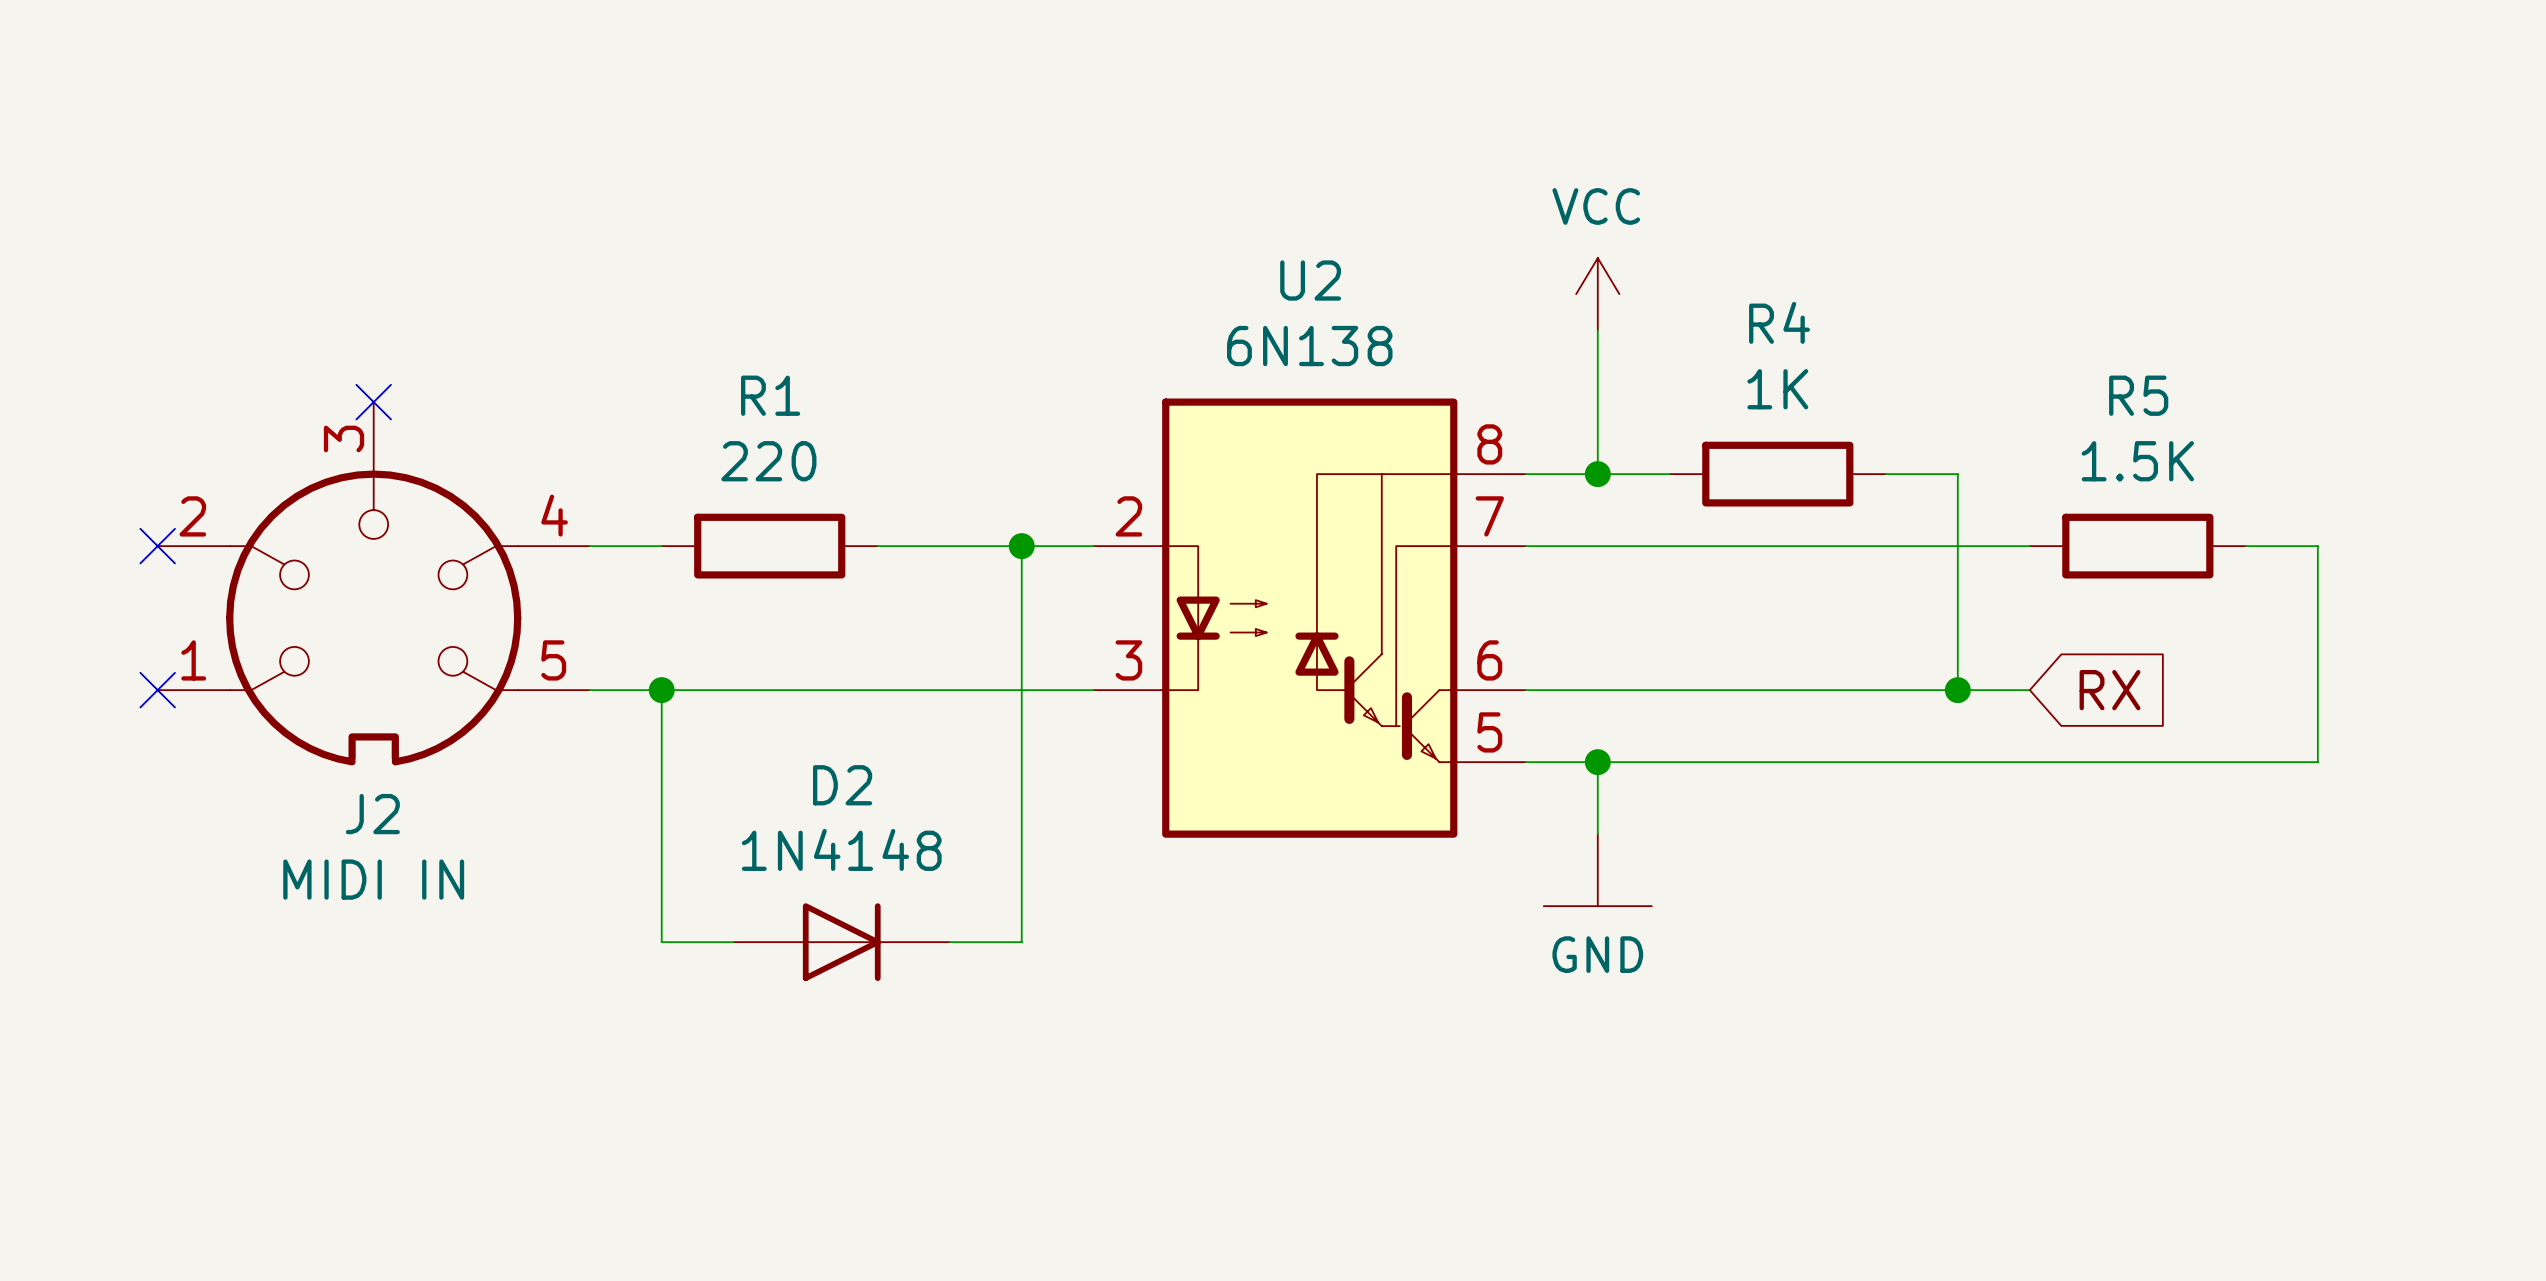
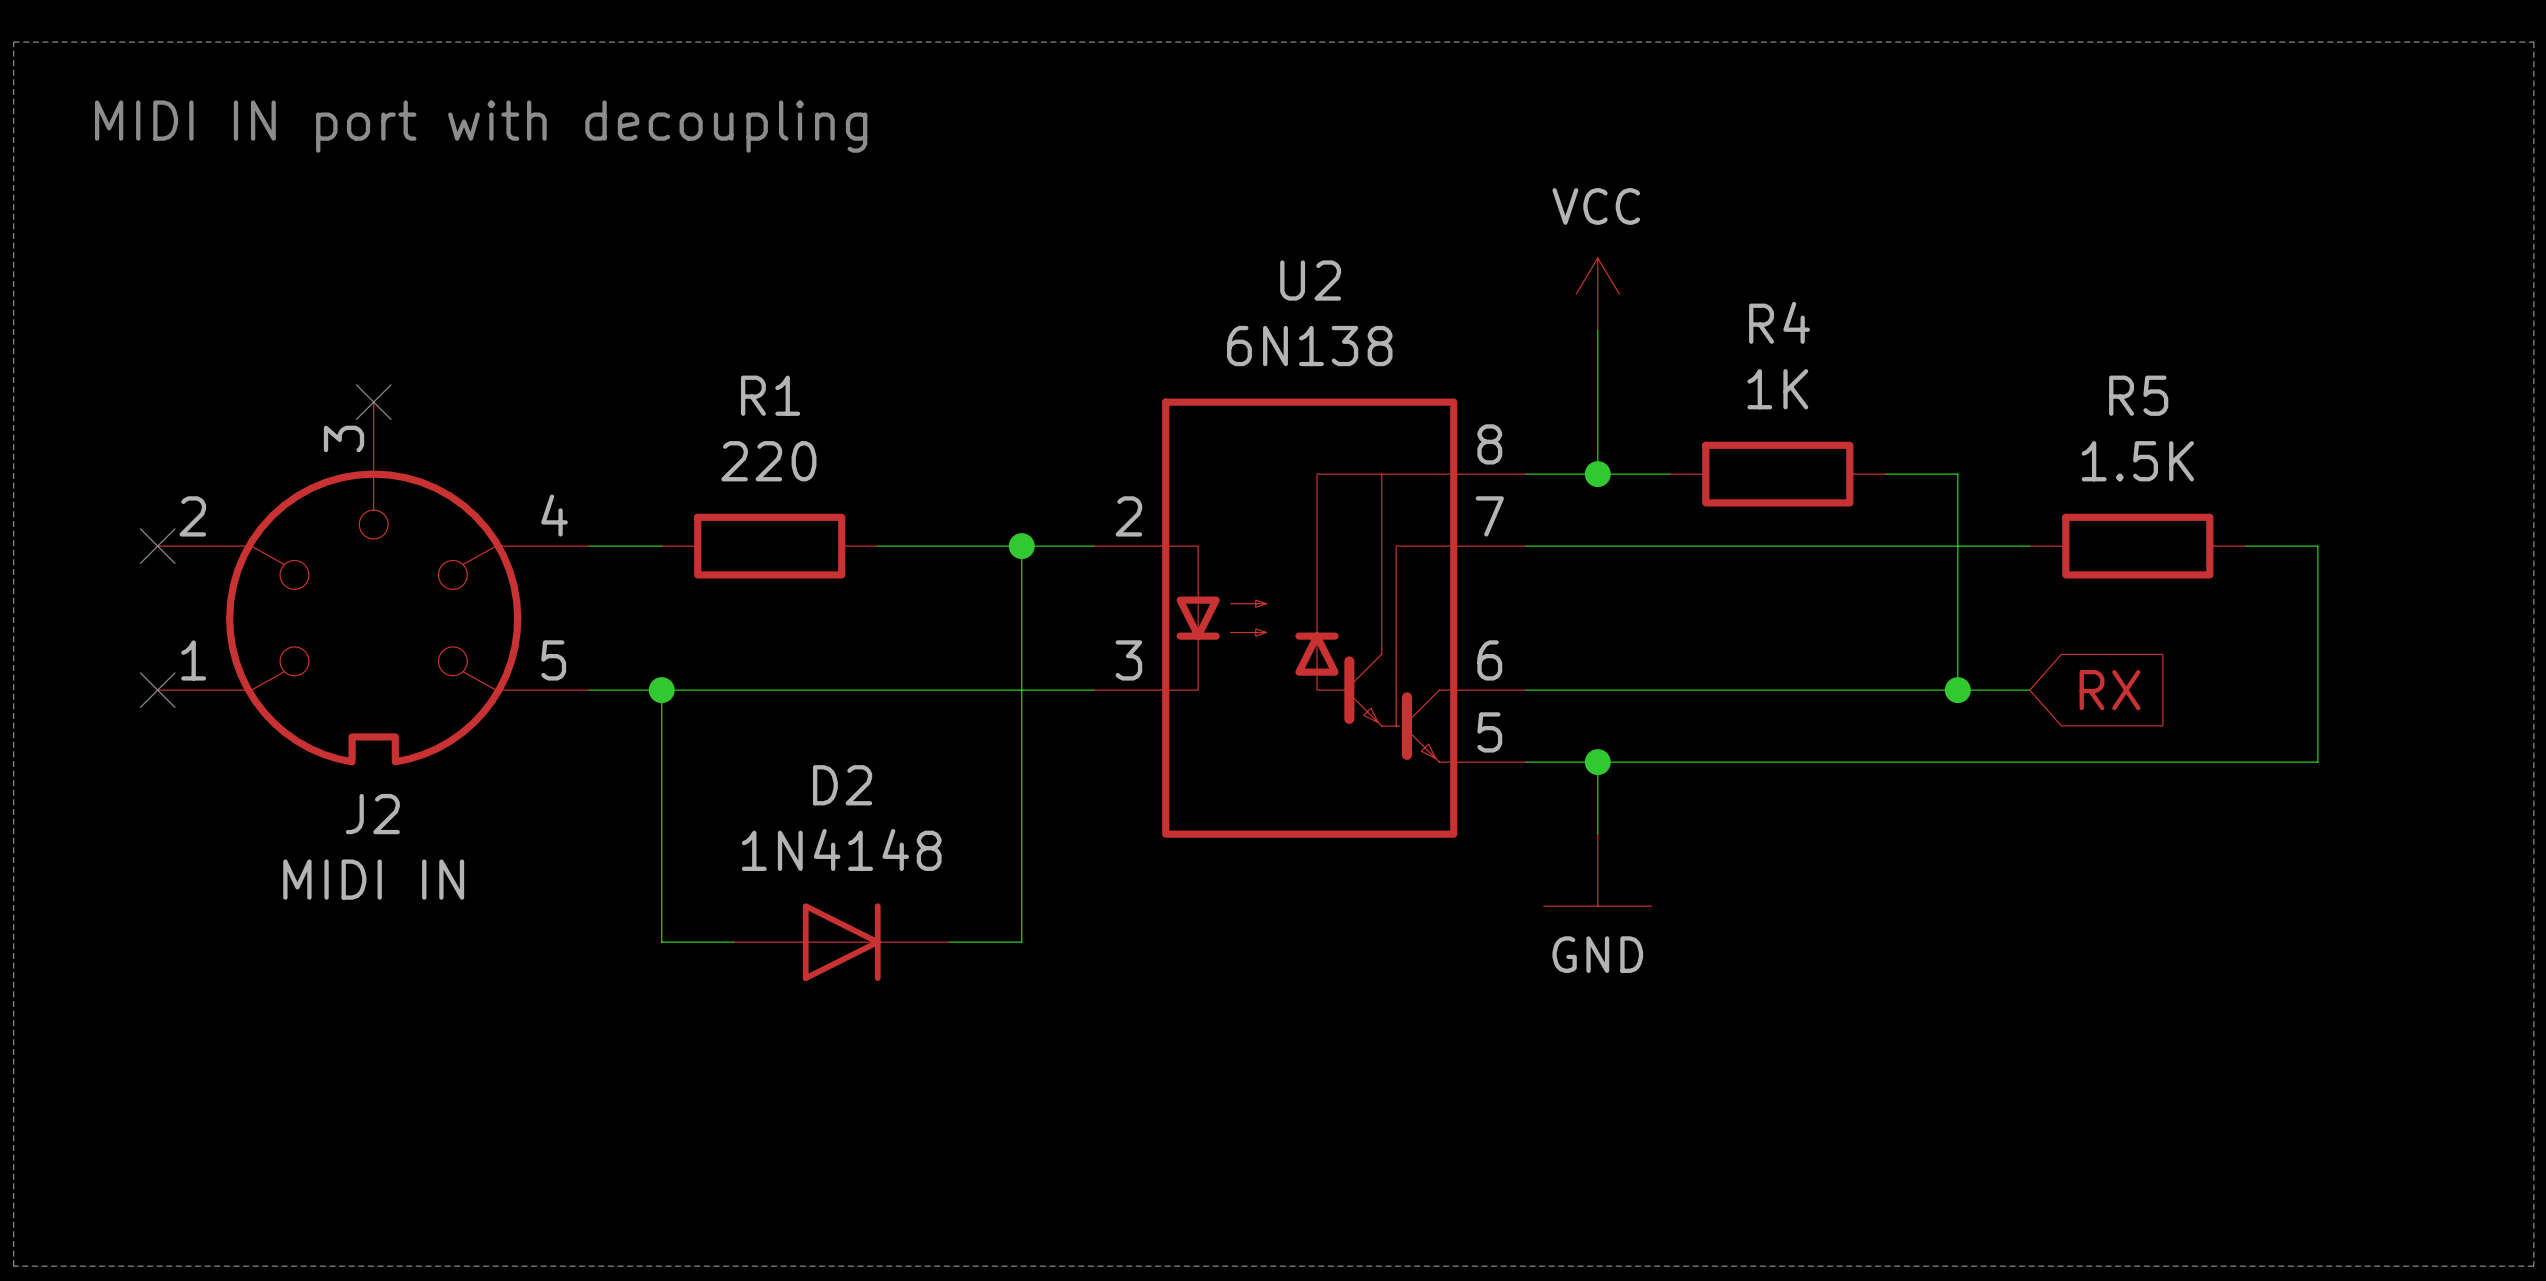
line: none -> (13, 42) (2533, 42) (2533, 1266) (13, 1266) (13, 42)
text: none -> MIDI IN port with decoupling (481, 126)

